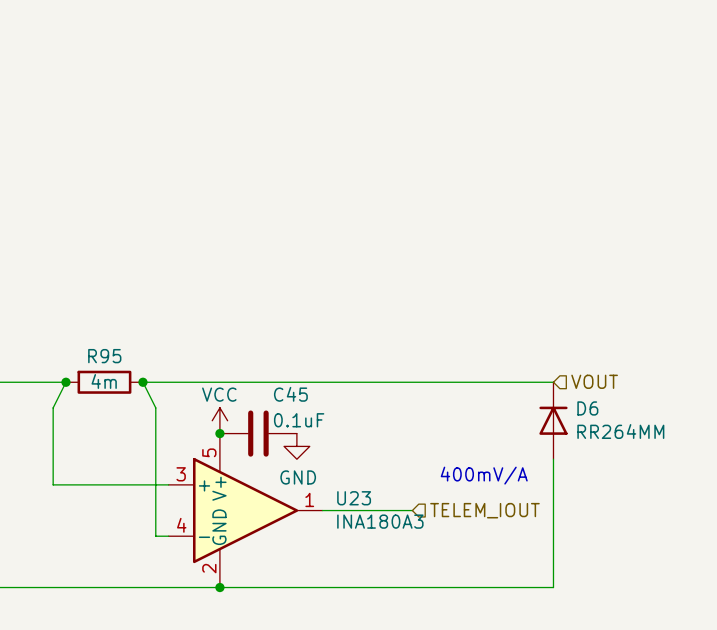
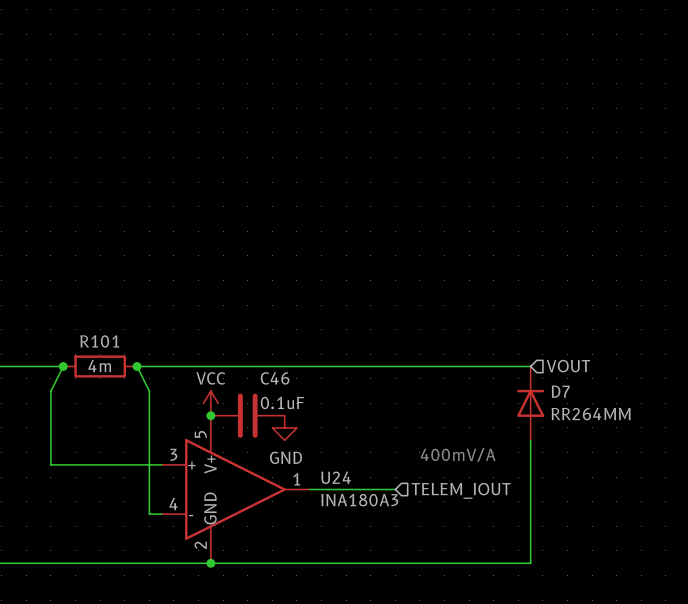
R95 name: R95 (104, 356) -> R101 (99, 341)
C45 name: C45 (290, 394) -> C46 (275, 378)
D6 name: D6 (587, 408) -> D7 (560, 391)
U23 name: U23 (354, 498) -> U24 (336, 477)

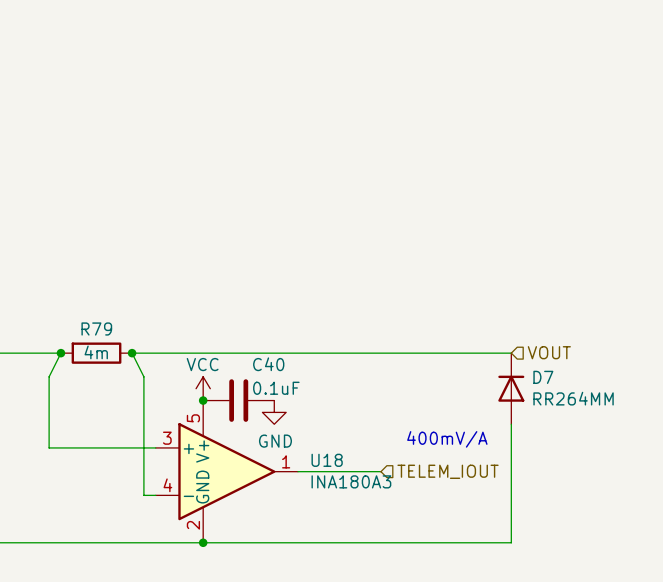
R101 name: R101 (99, 341) -> R79 (96, 329)
C46 name: C46 (275, 378) -> C40 (268, 364)
U24 name: U24 (336, 477) -> U18 (327, 460)

